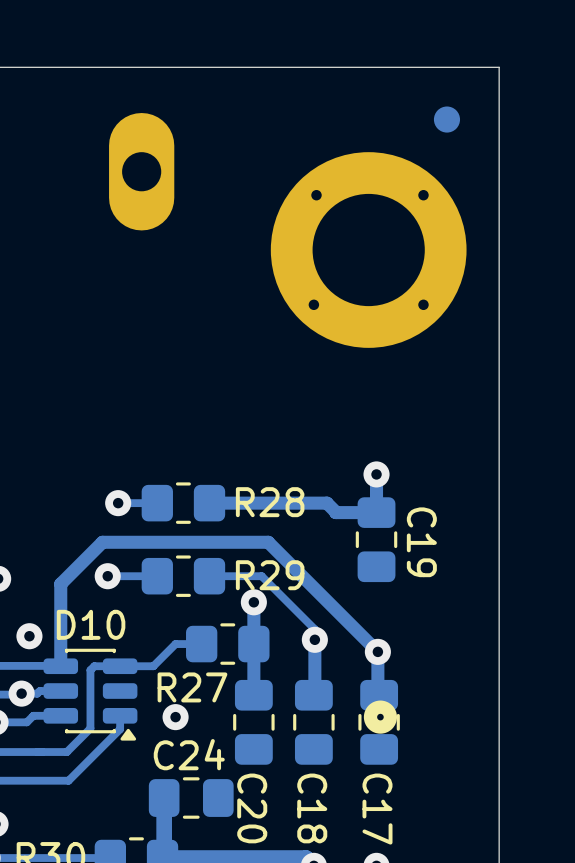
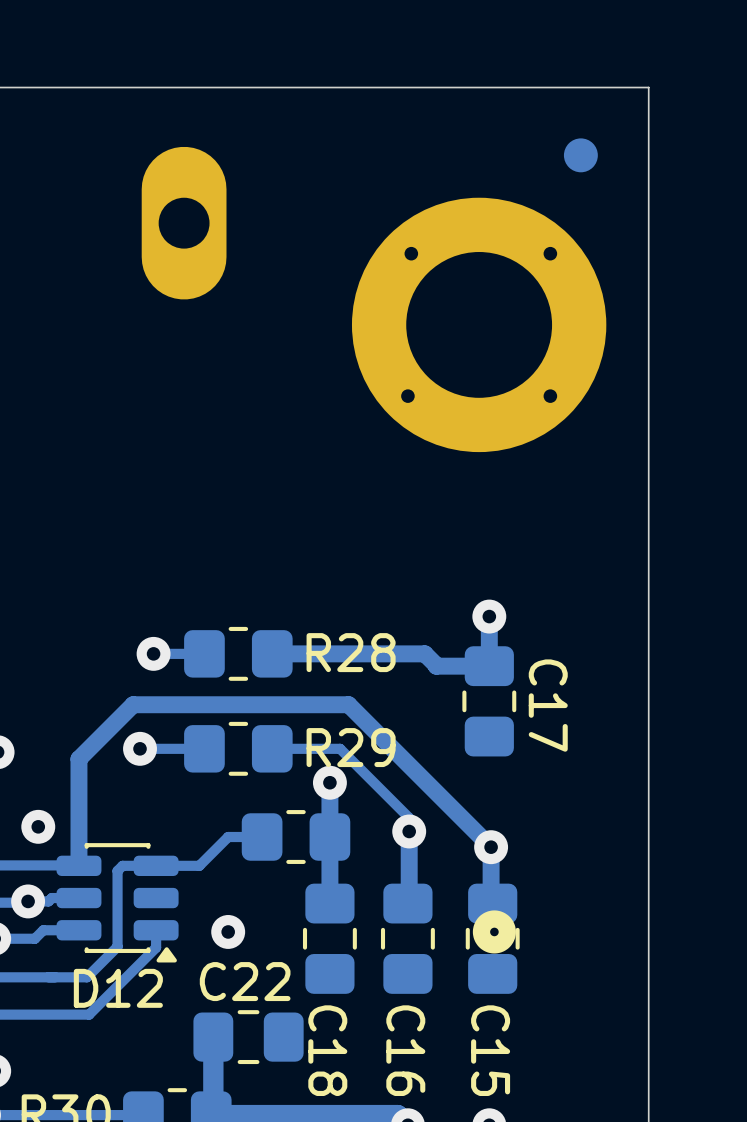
C19 name: C19 (421, 542) -> C17 (548, 705)
D10 name: D10 (91, 624) -> D12 (118, 988)
R27 name: R27 (192, 687) -> none
C24 name: C24 (189, 754) -> C22 (245, 981)
C20 name: C20 (252, 808) -> C18 (327, 1050)
C18 name: C18 (312, 808) -> C16 (405, 1050)
C17 name: C17 (377, 809) -> C15 (490, 1050)

